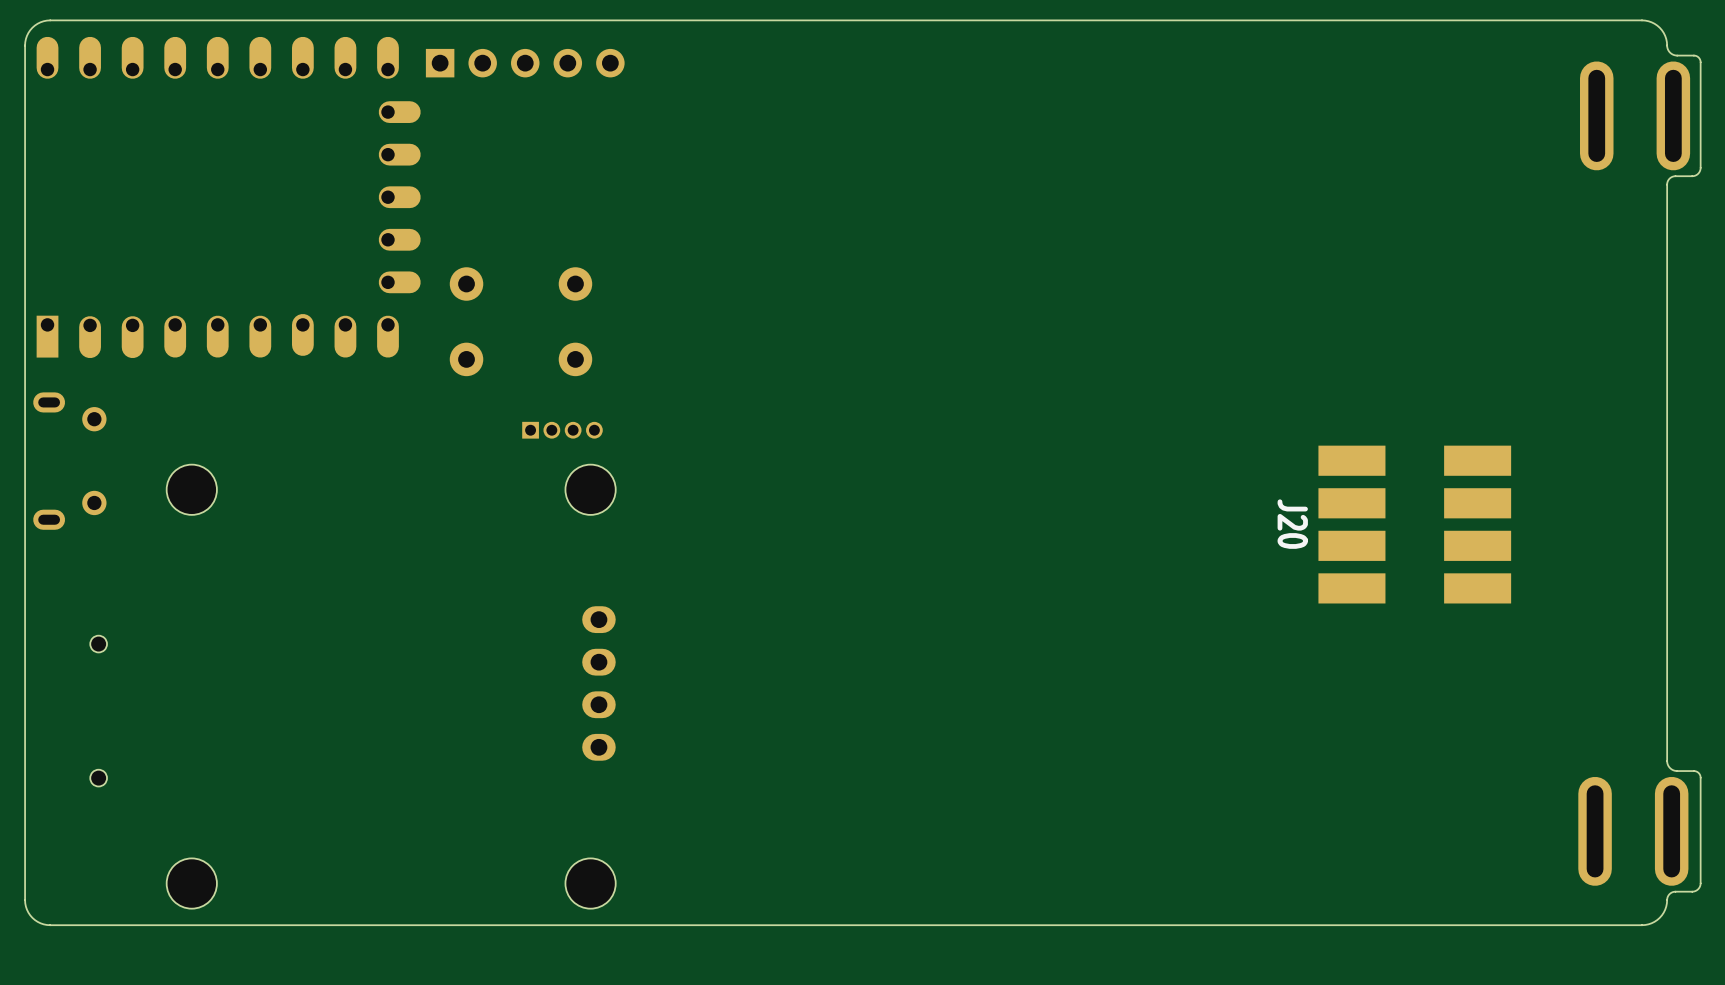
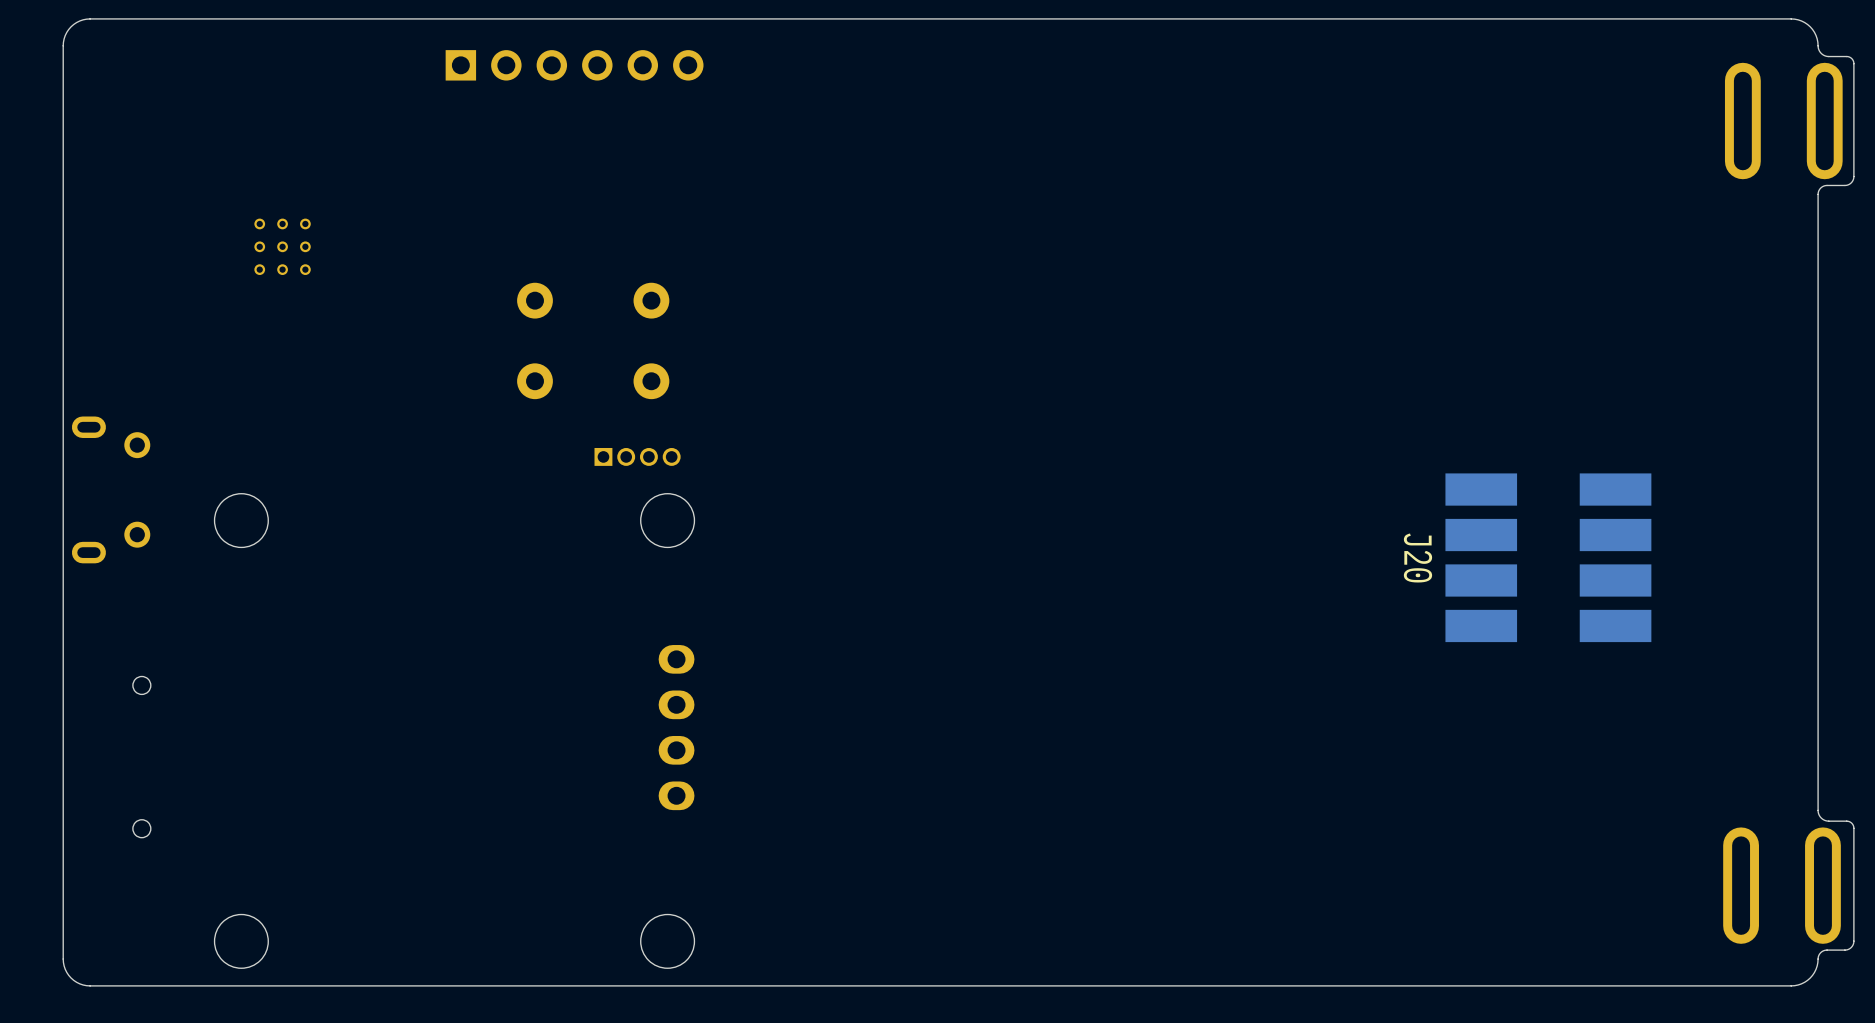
part: none -> (574, 65)
part: (525, 63) -> none
part: (228, 197) -> none
part: none -> (282, 246)

